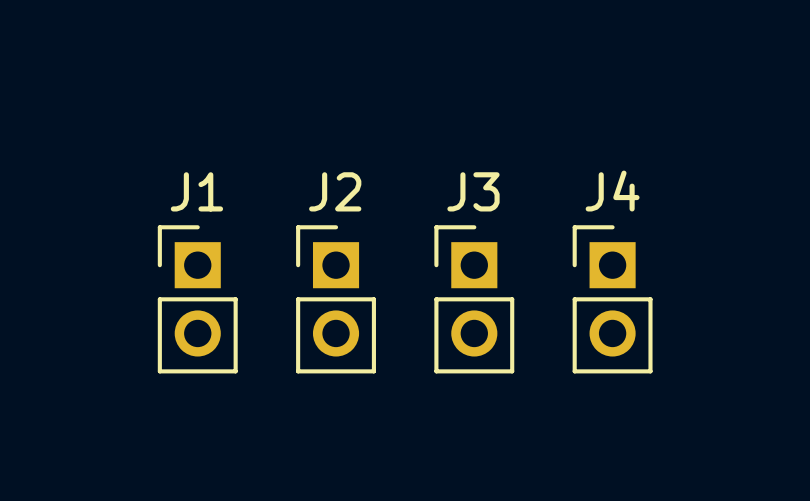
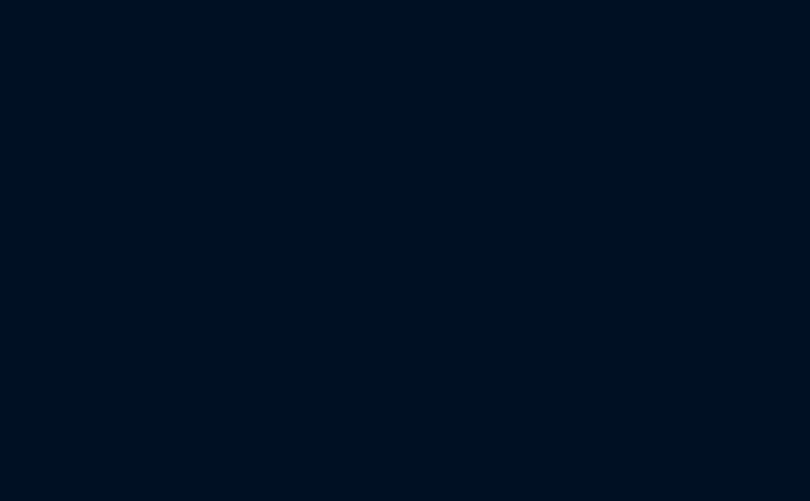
J1: (197, 299) -> none
J2: (336, 299) -> none
J3: (474, 299) -> none
J4: (612, 299) -> none

